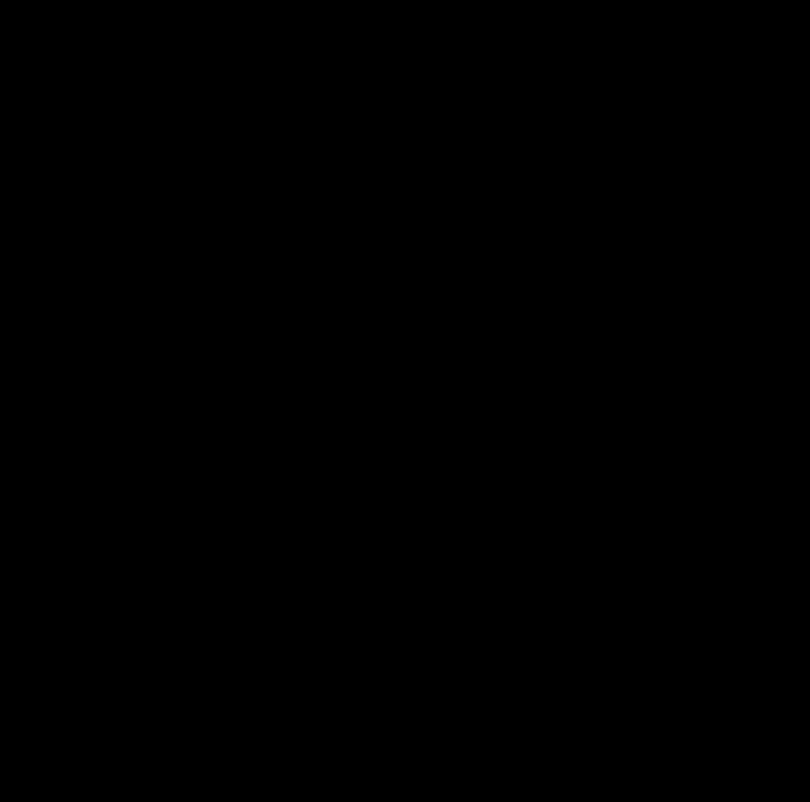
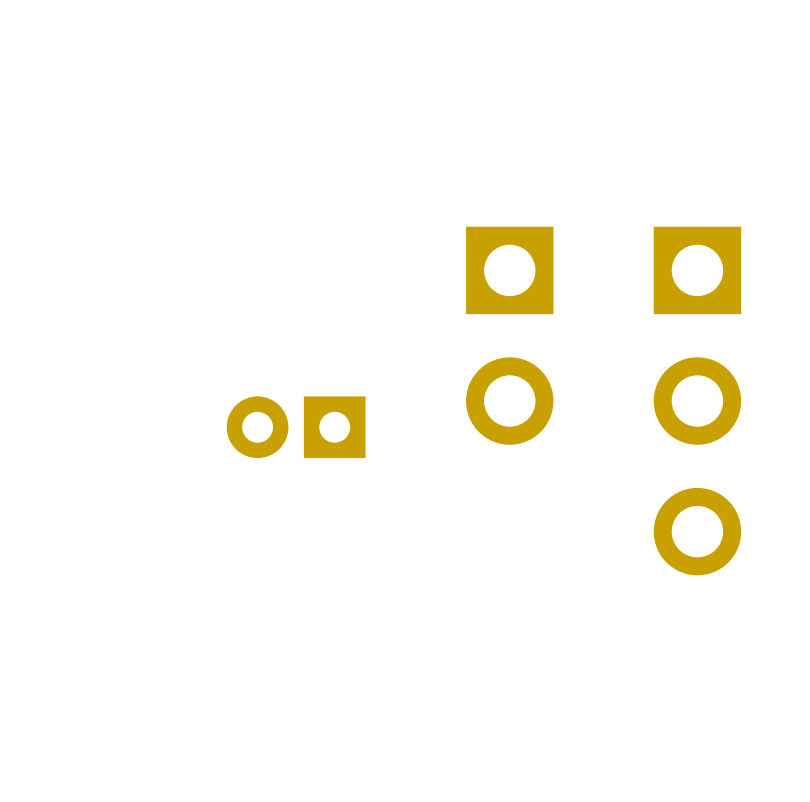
part: none -> (509, 335)
part: none -> (697, 401)
part: none -> (296, 427)

